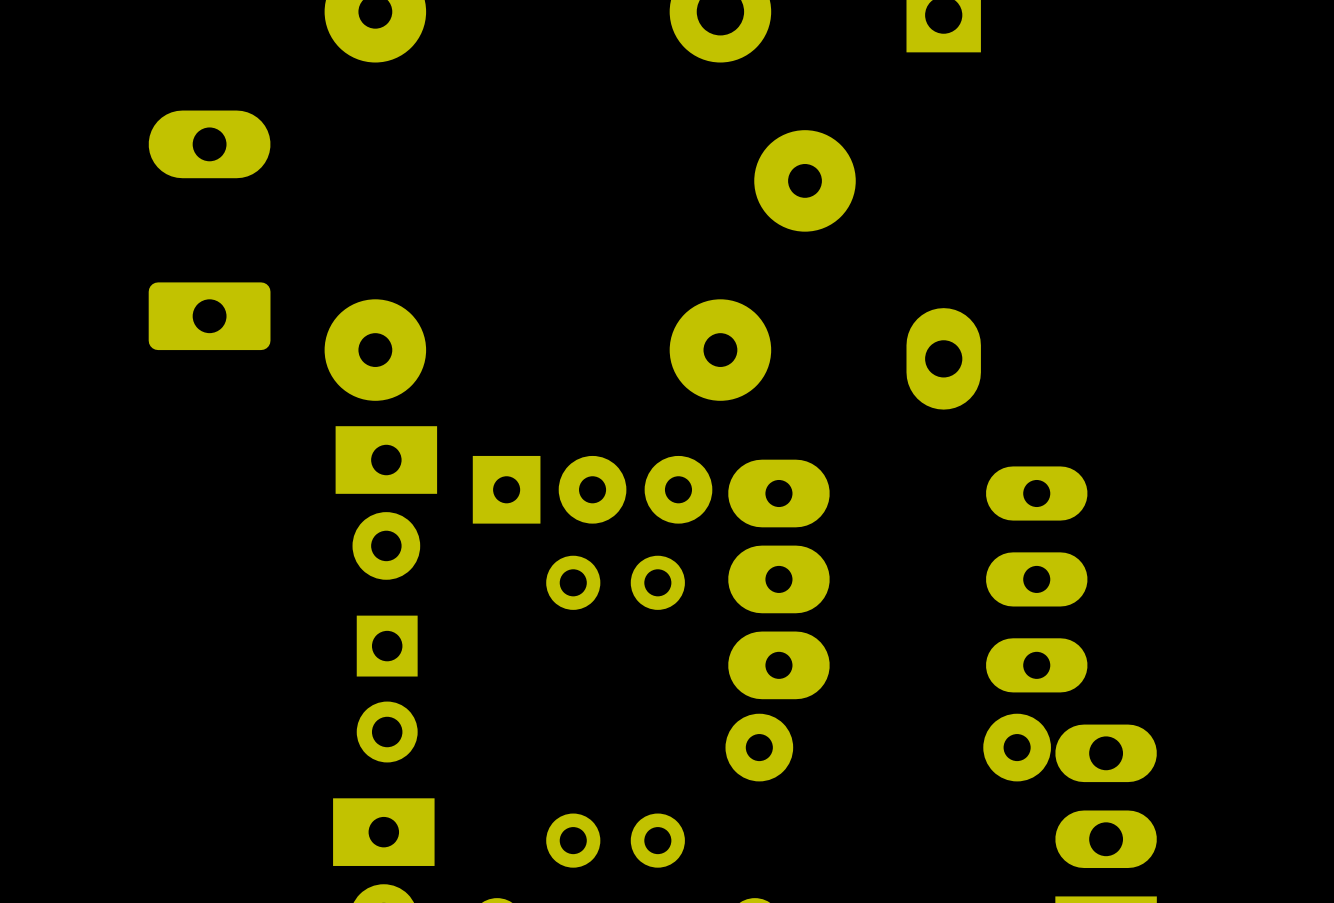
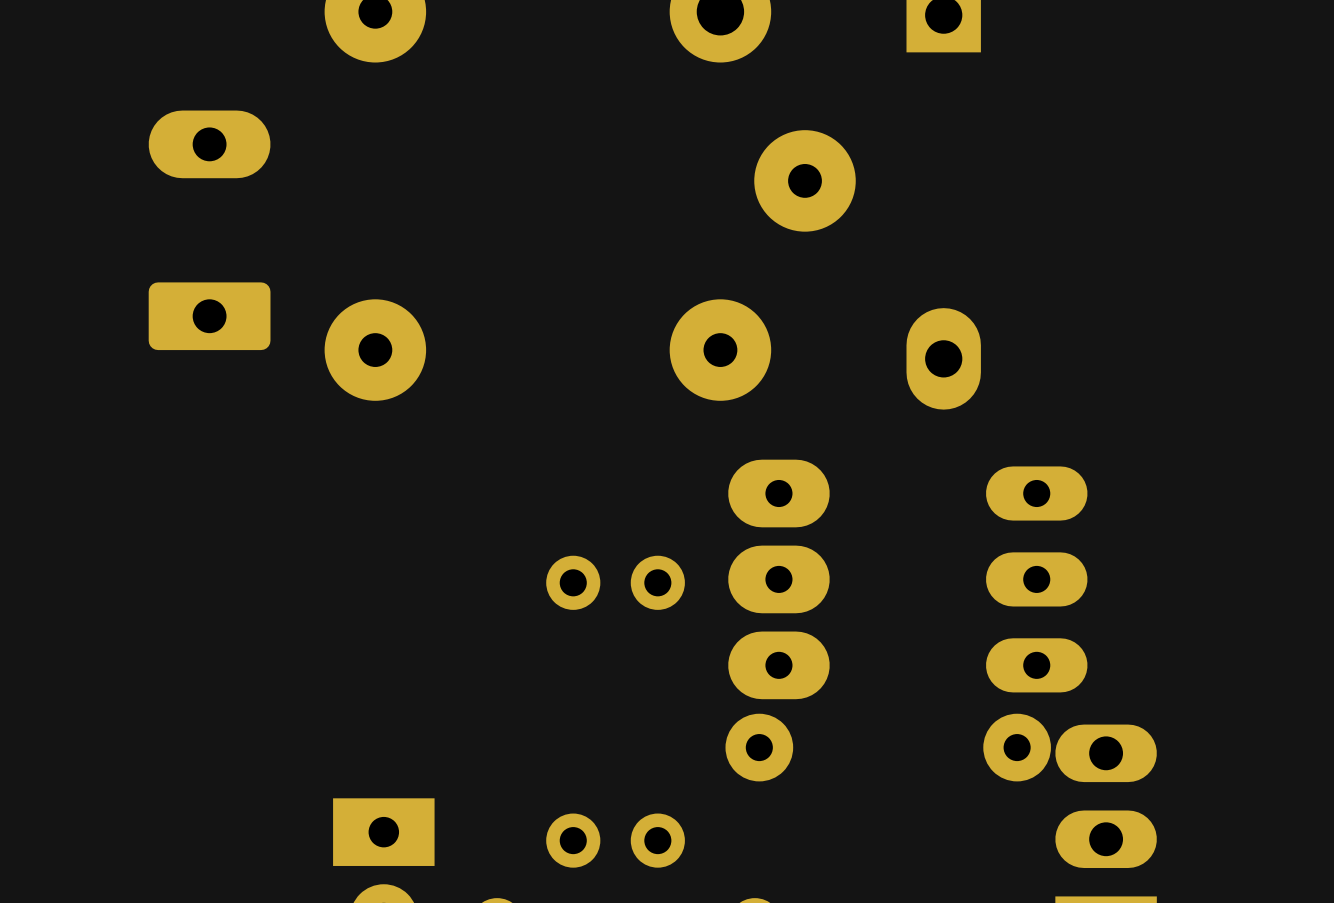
part: (592, 489) -> none
part: (386, 502) -> none
part: (387, 689) -> none

